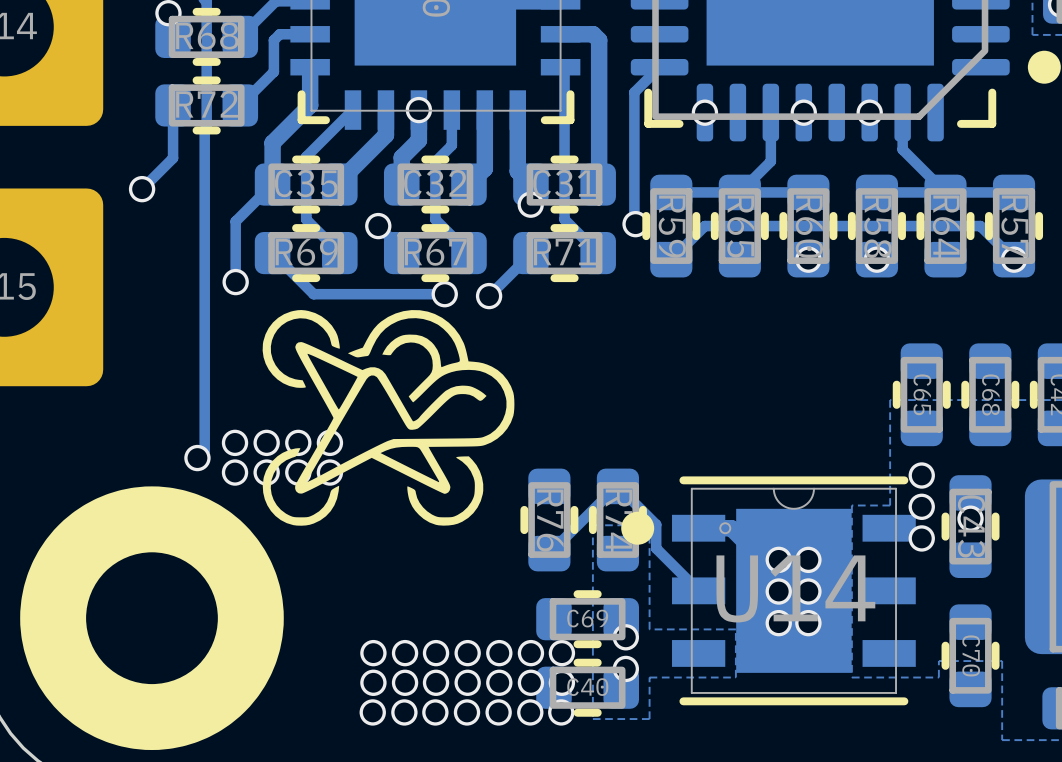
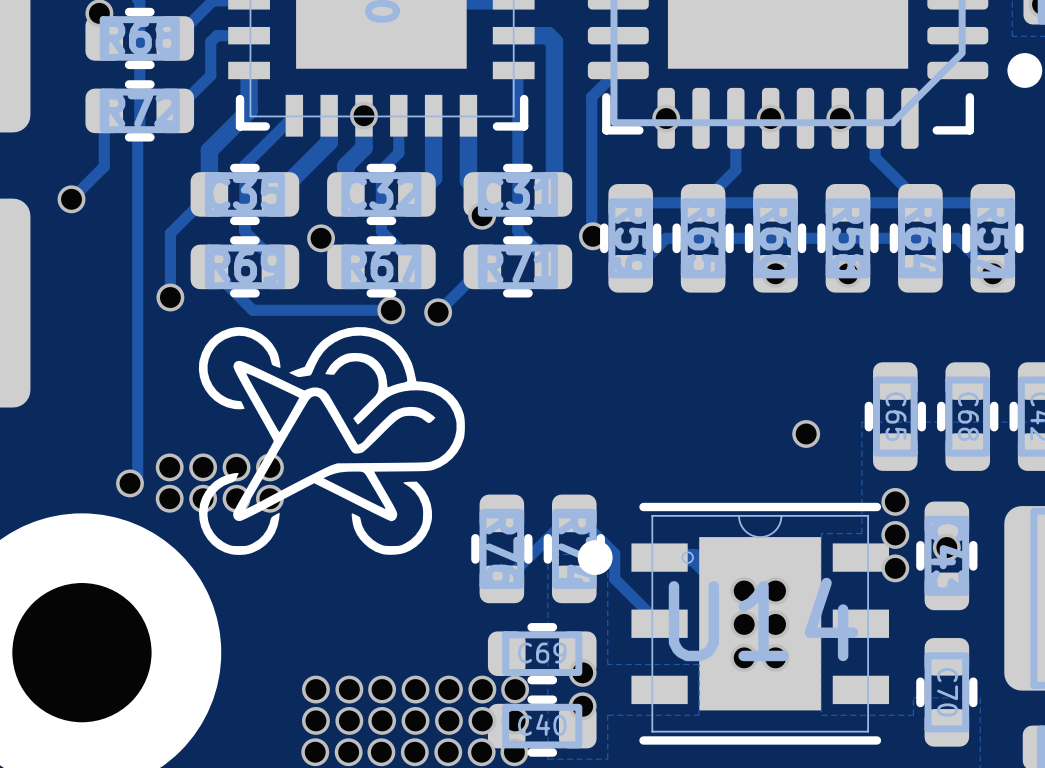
via: none -> (806, 433)

